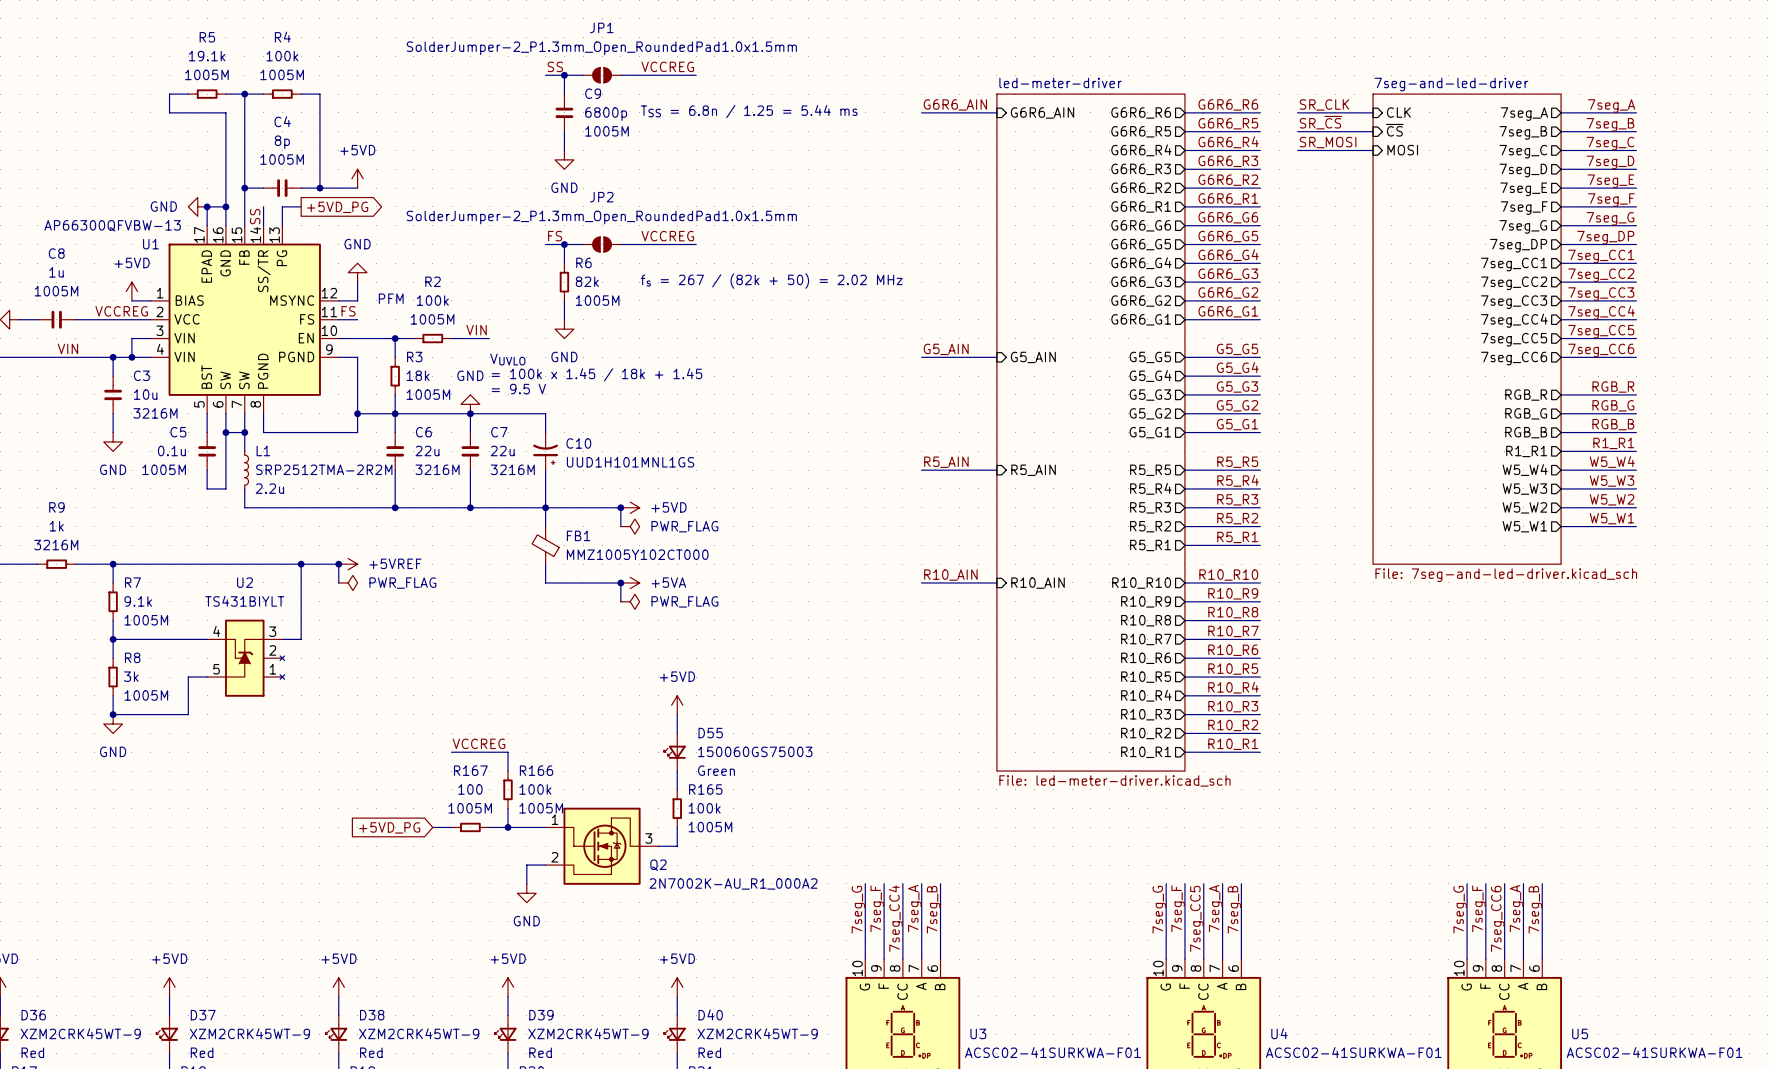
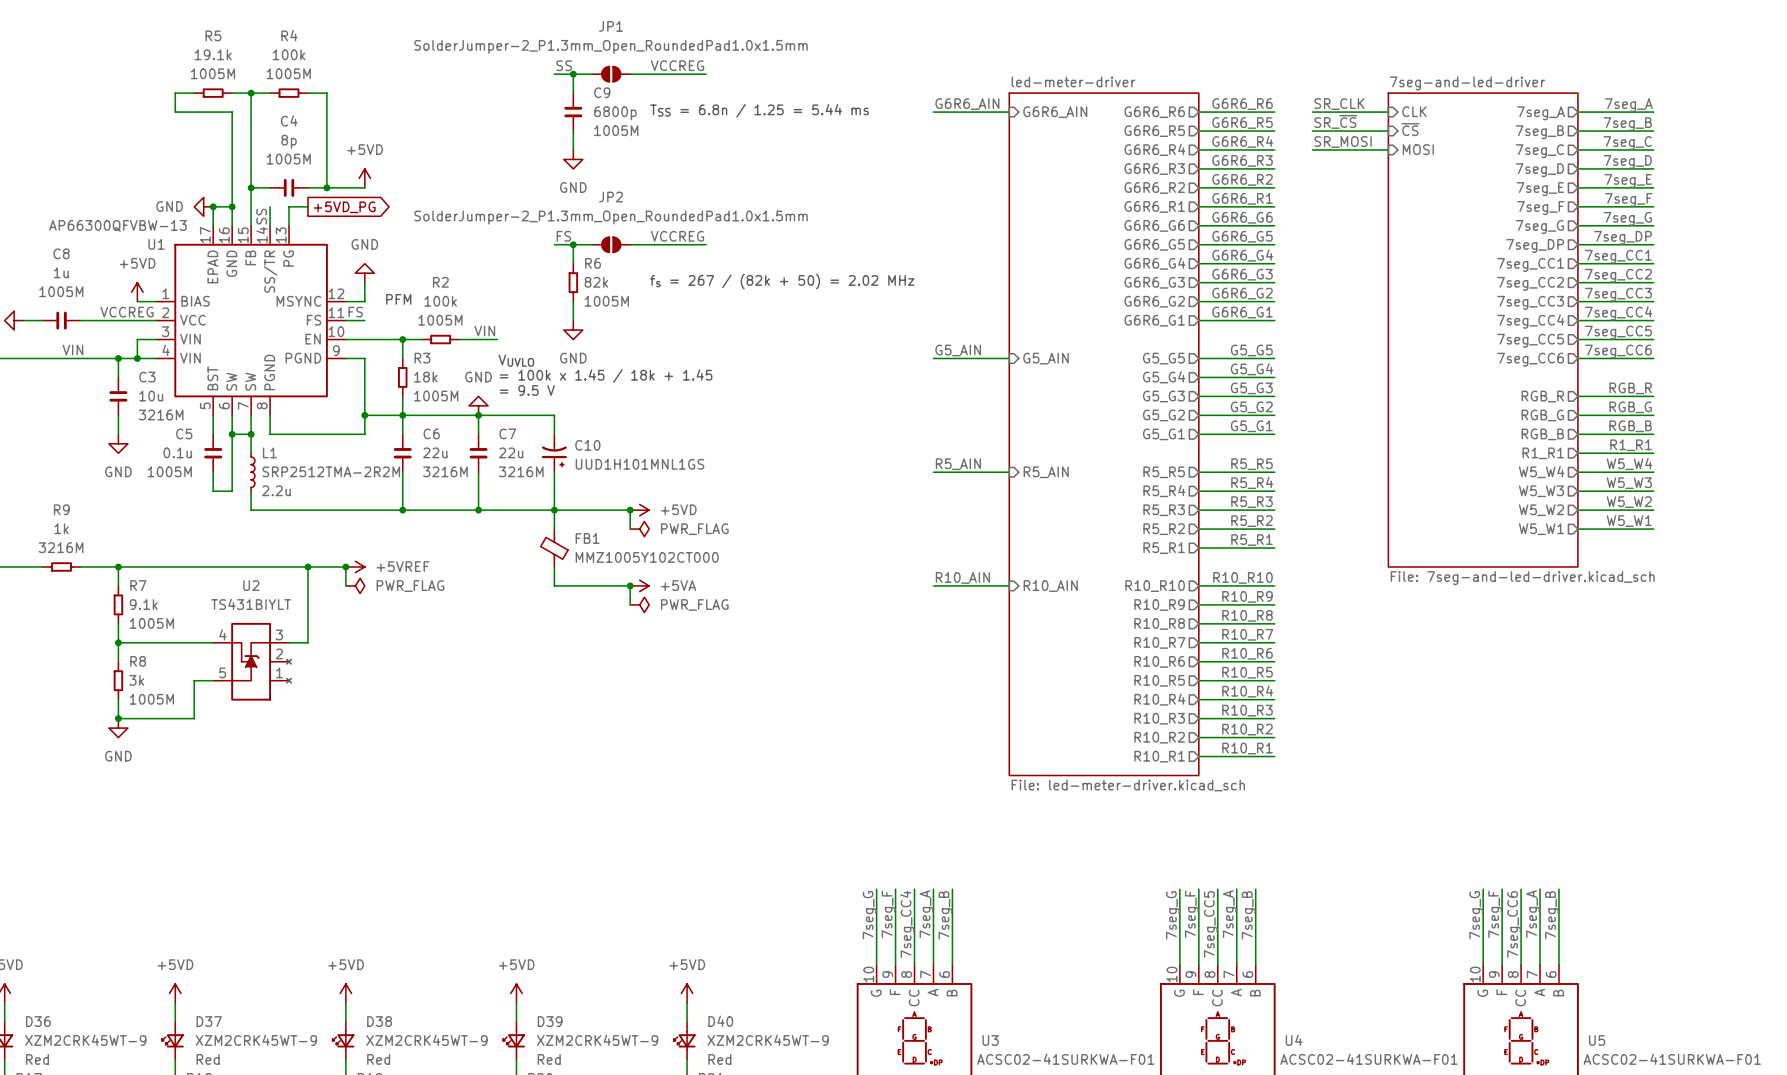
power symbol: +5VD (677, 705) -> none
wire: (677, 714) (677, 733) -> none
label: VCCREG (478, 743) -> none
wire: (451, 752) (508, 752) (508, 771) -> none
D55: 150060GS75003 (674, 752) -> none
wire: (677, 771) (677, 789) -> none
R166: 100k (508, 789) -> none
wire: (508, 808) (508, 827) -> none
R165: 100k (677, 808) -> none
global label: +5VD_PG (389, 827) -> none
wire: (432, 827) (451, 827) -> none
R167: 100 (470, 827) -> none
wire: (489, 827) (545, 827) -> none
junction: (508, 827) -> none
wire: (677, 827) (677, 846) (658, 846) -> none
Q2: 2N7002K-AU_R1_000A2 (602, 846) -> none
wire: (545, 865) (526, 865) (526, 883) -> none
power symbol: GND (526, 893) -> none

